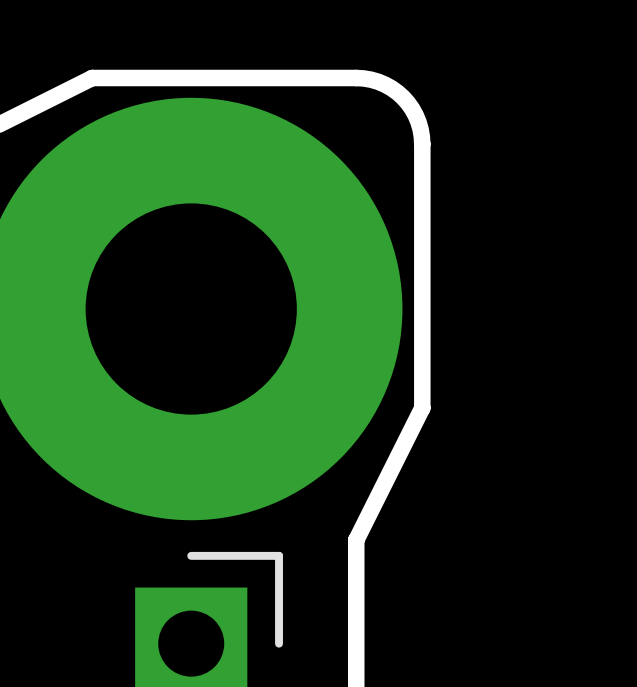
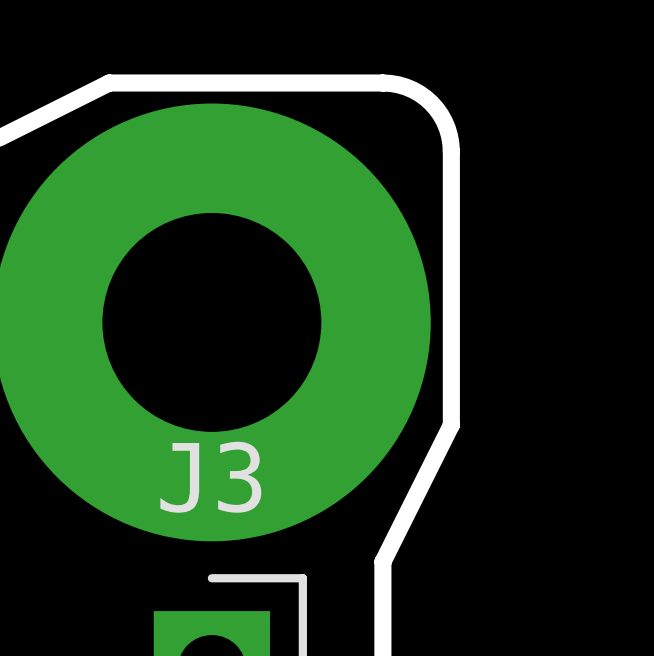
J3 name: none -> J3 (210, 477)

